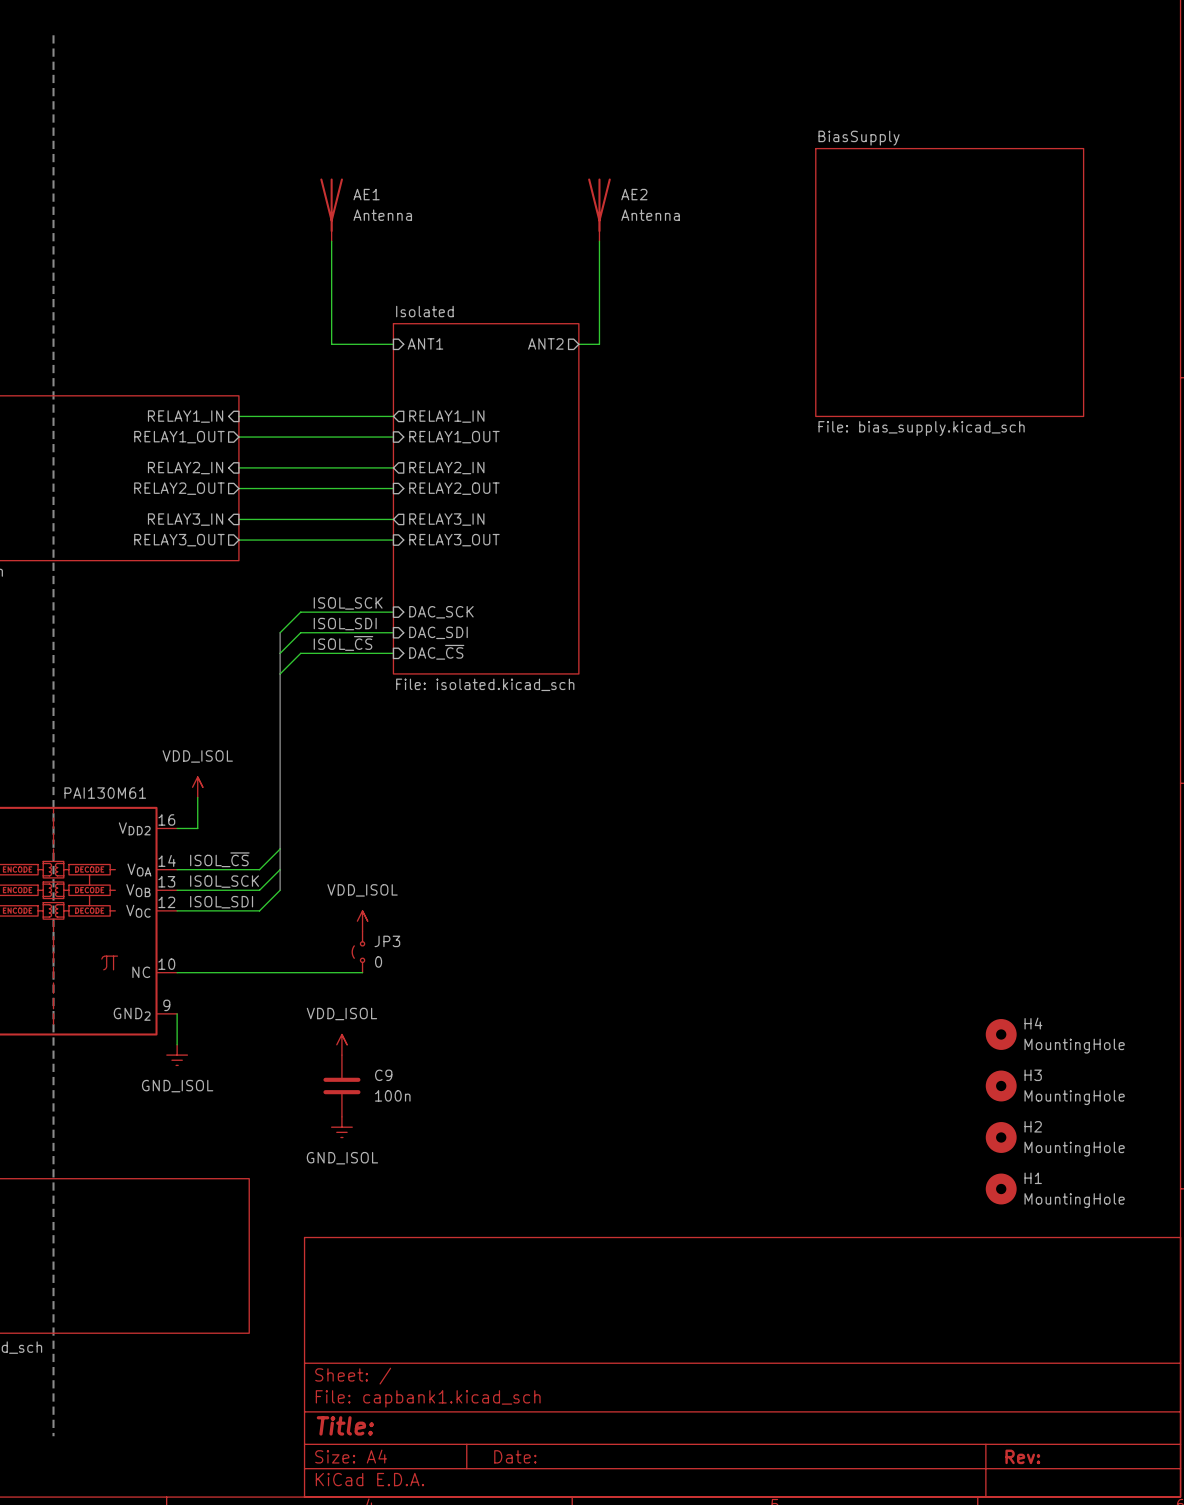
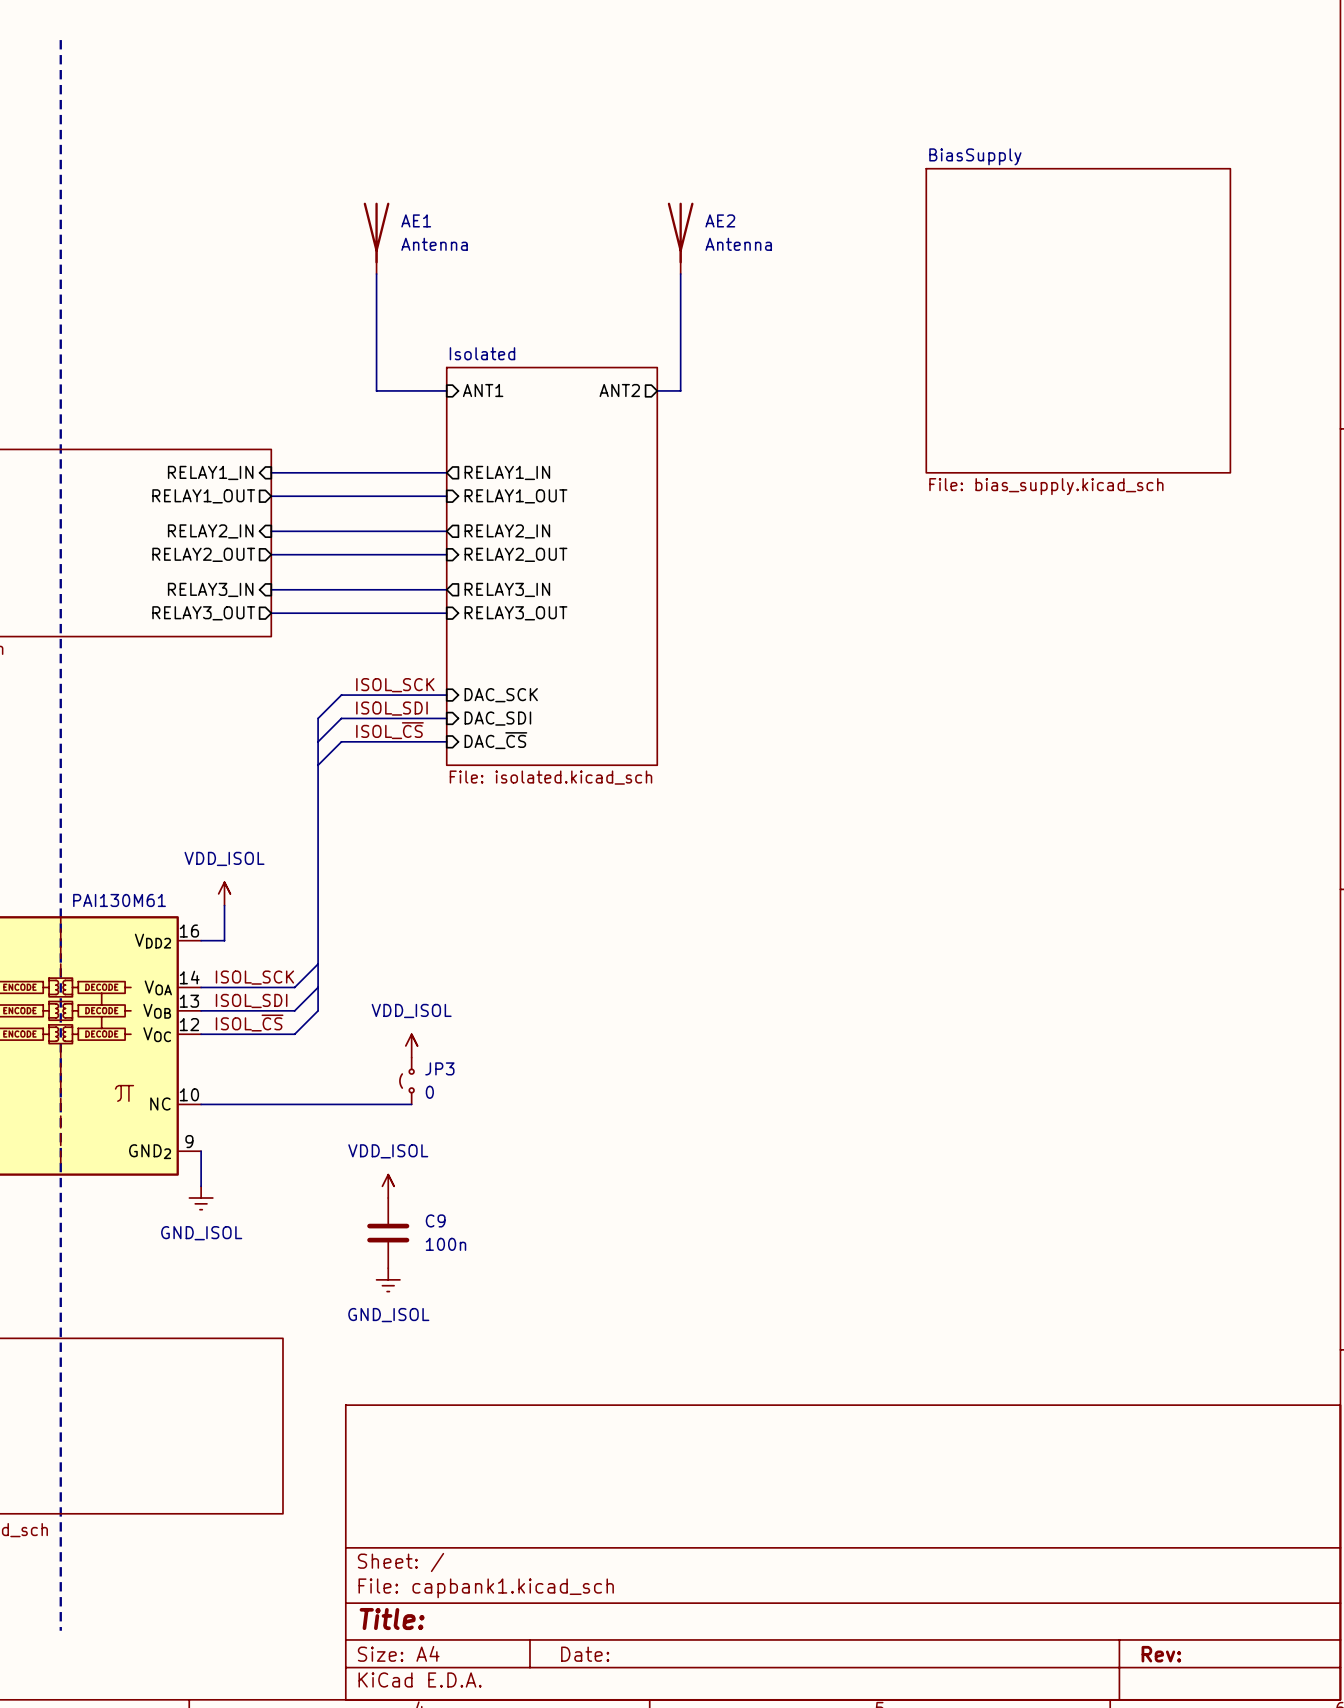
label: ISOL_~{CS} (219, 859) -> ISOL_SCK (254, 977)
label: ISOL_SCK (224, 881) -> ISOL_SDI (251, 1000)
label: ISOL_SDI (221, 902) -> ISOL_~{CS} (249, 1023)
H4: MountingHole (1001, 1034) -> none
H3: MountingHole (1001, 1085) -> none
H2: MountingHole (1001, 1137) -> none
H1: MountingHole (1001, 1189) -> none

